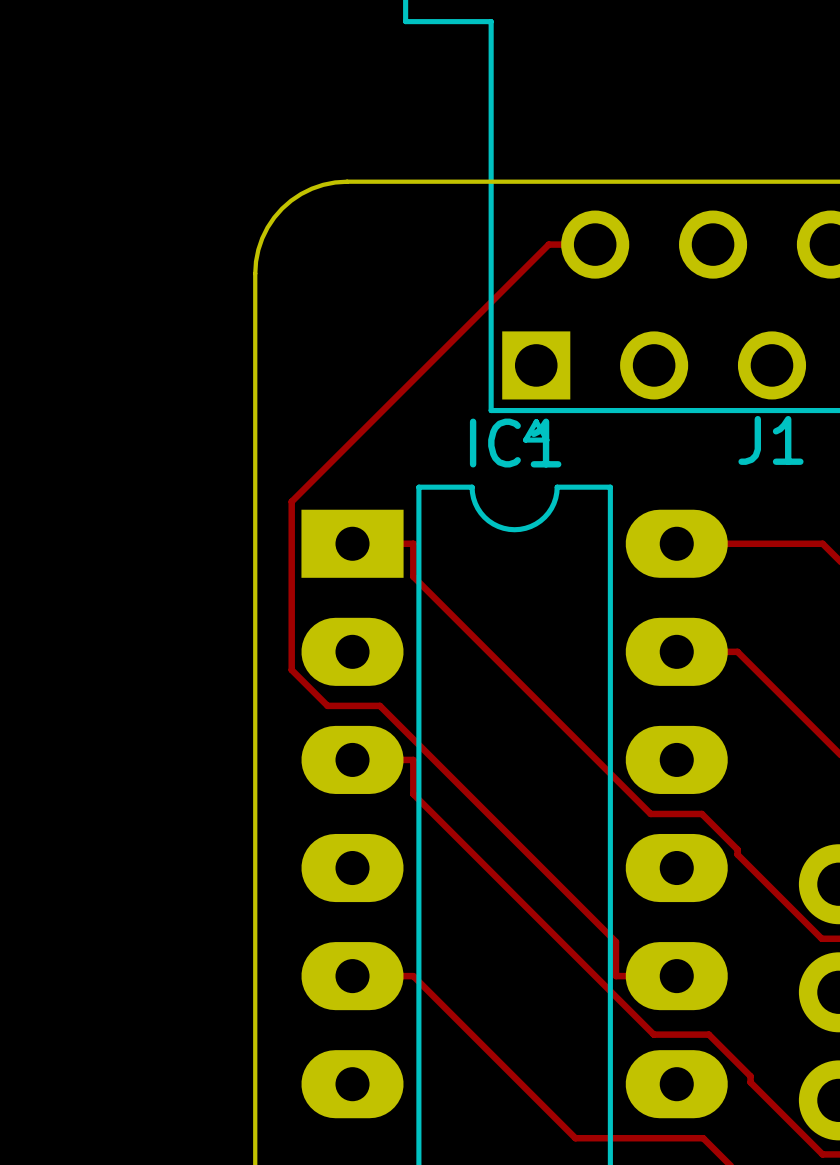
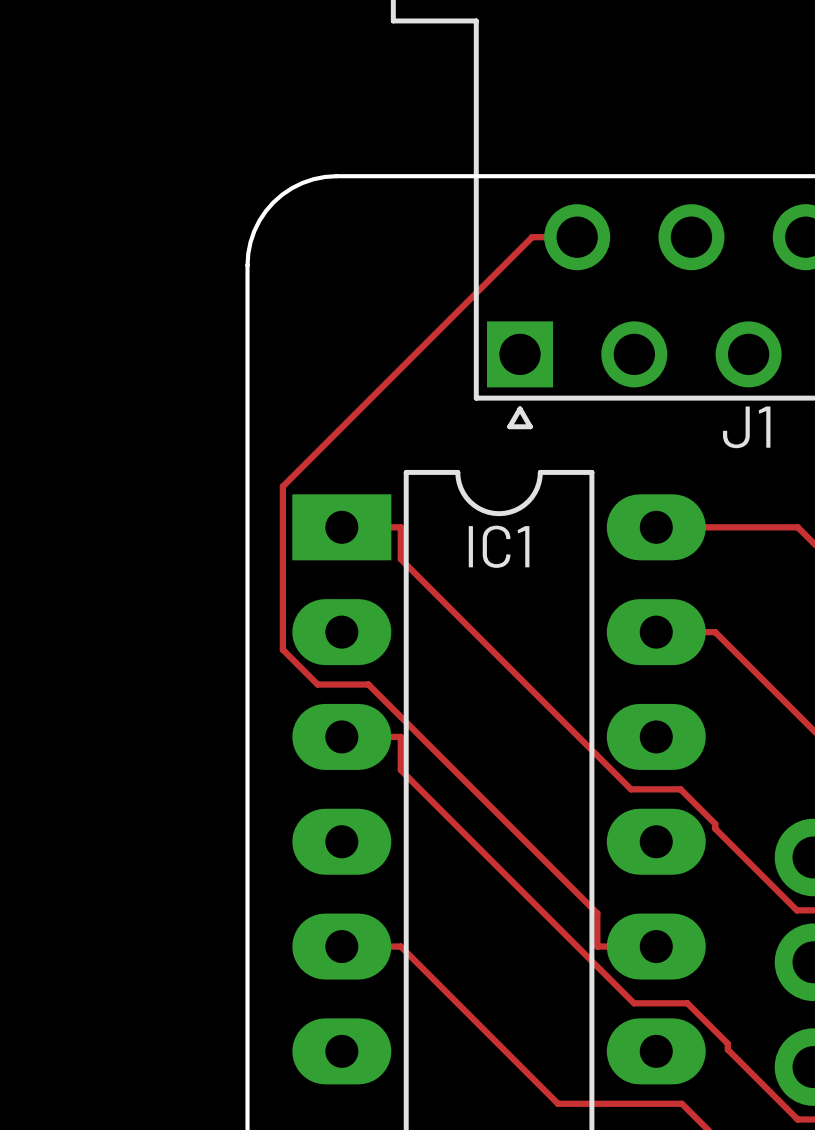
IC1 name position: IC1 (515, 443) -> IC1 (499, 546)

